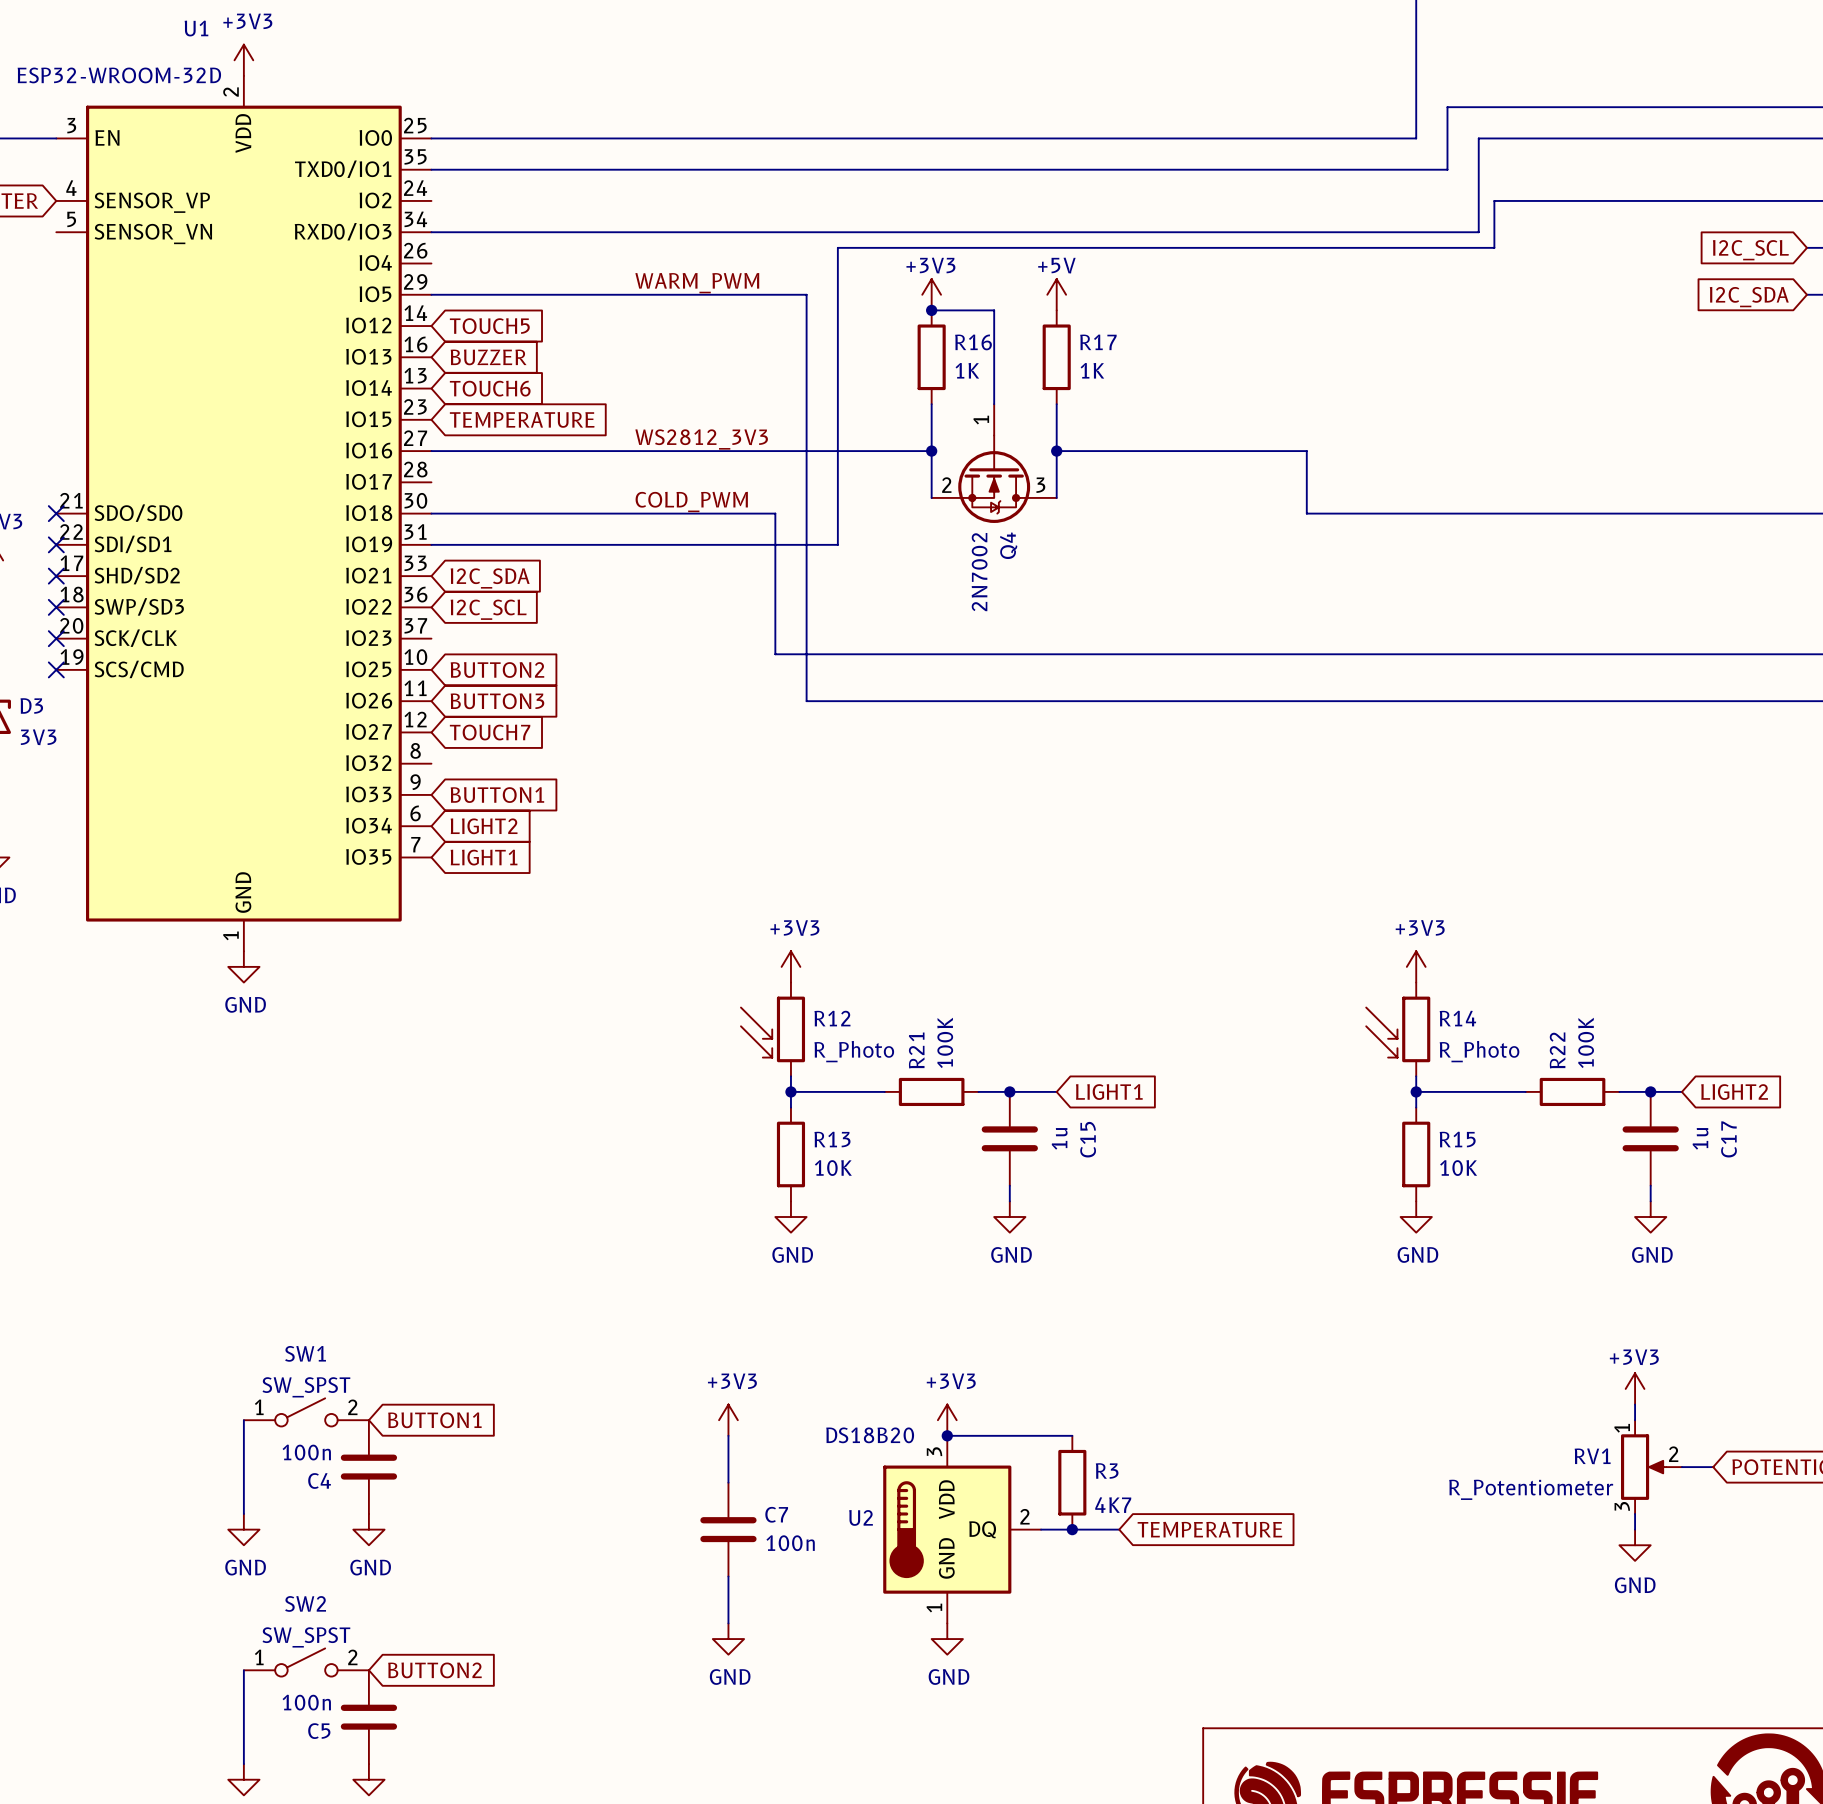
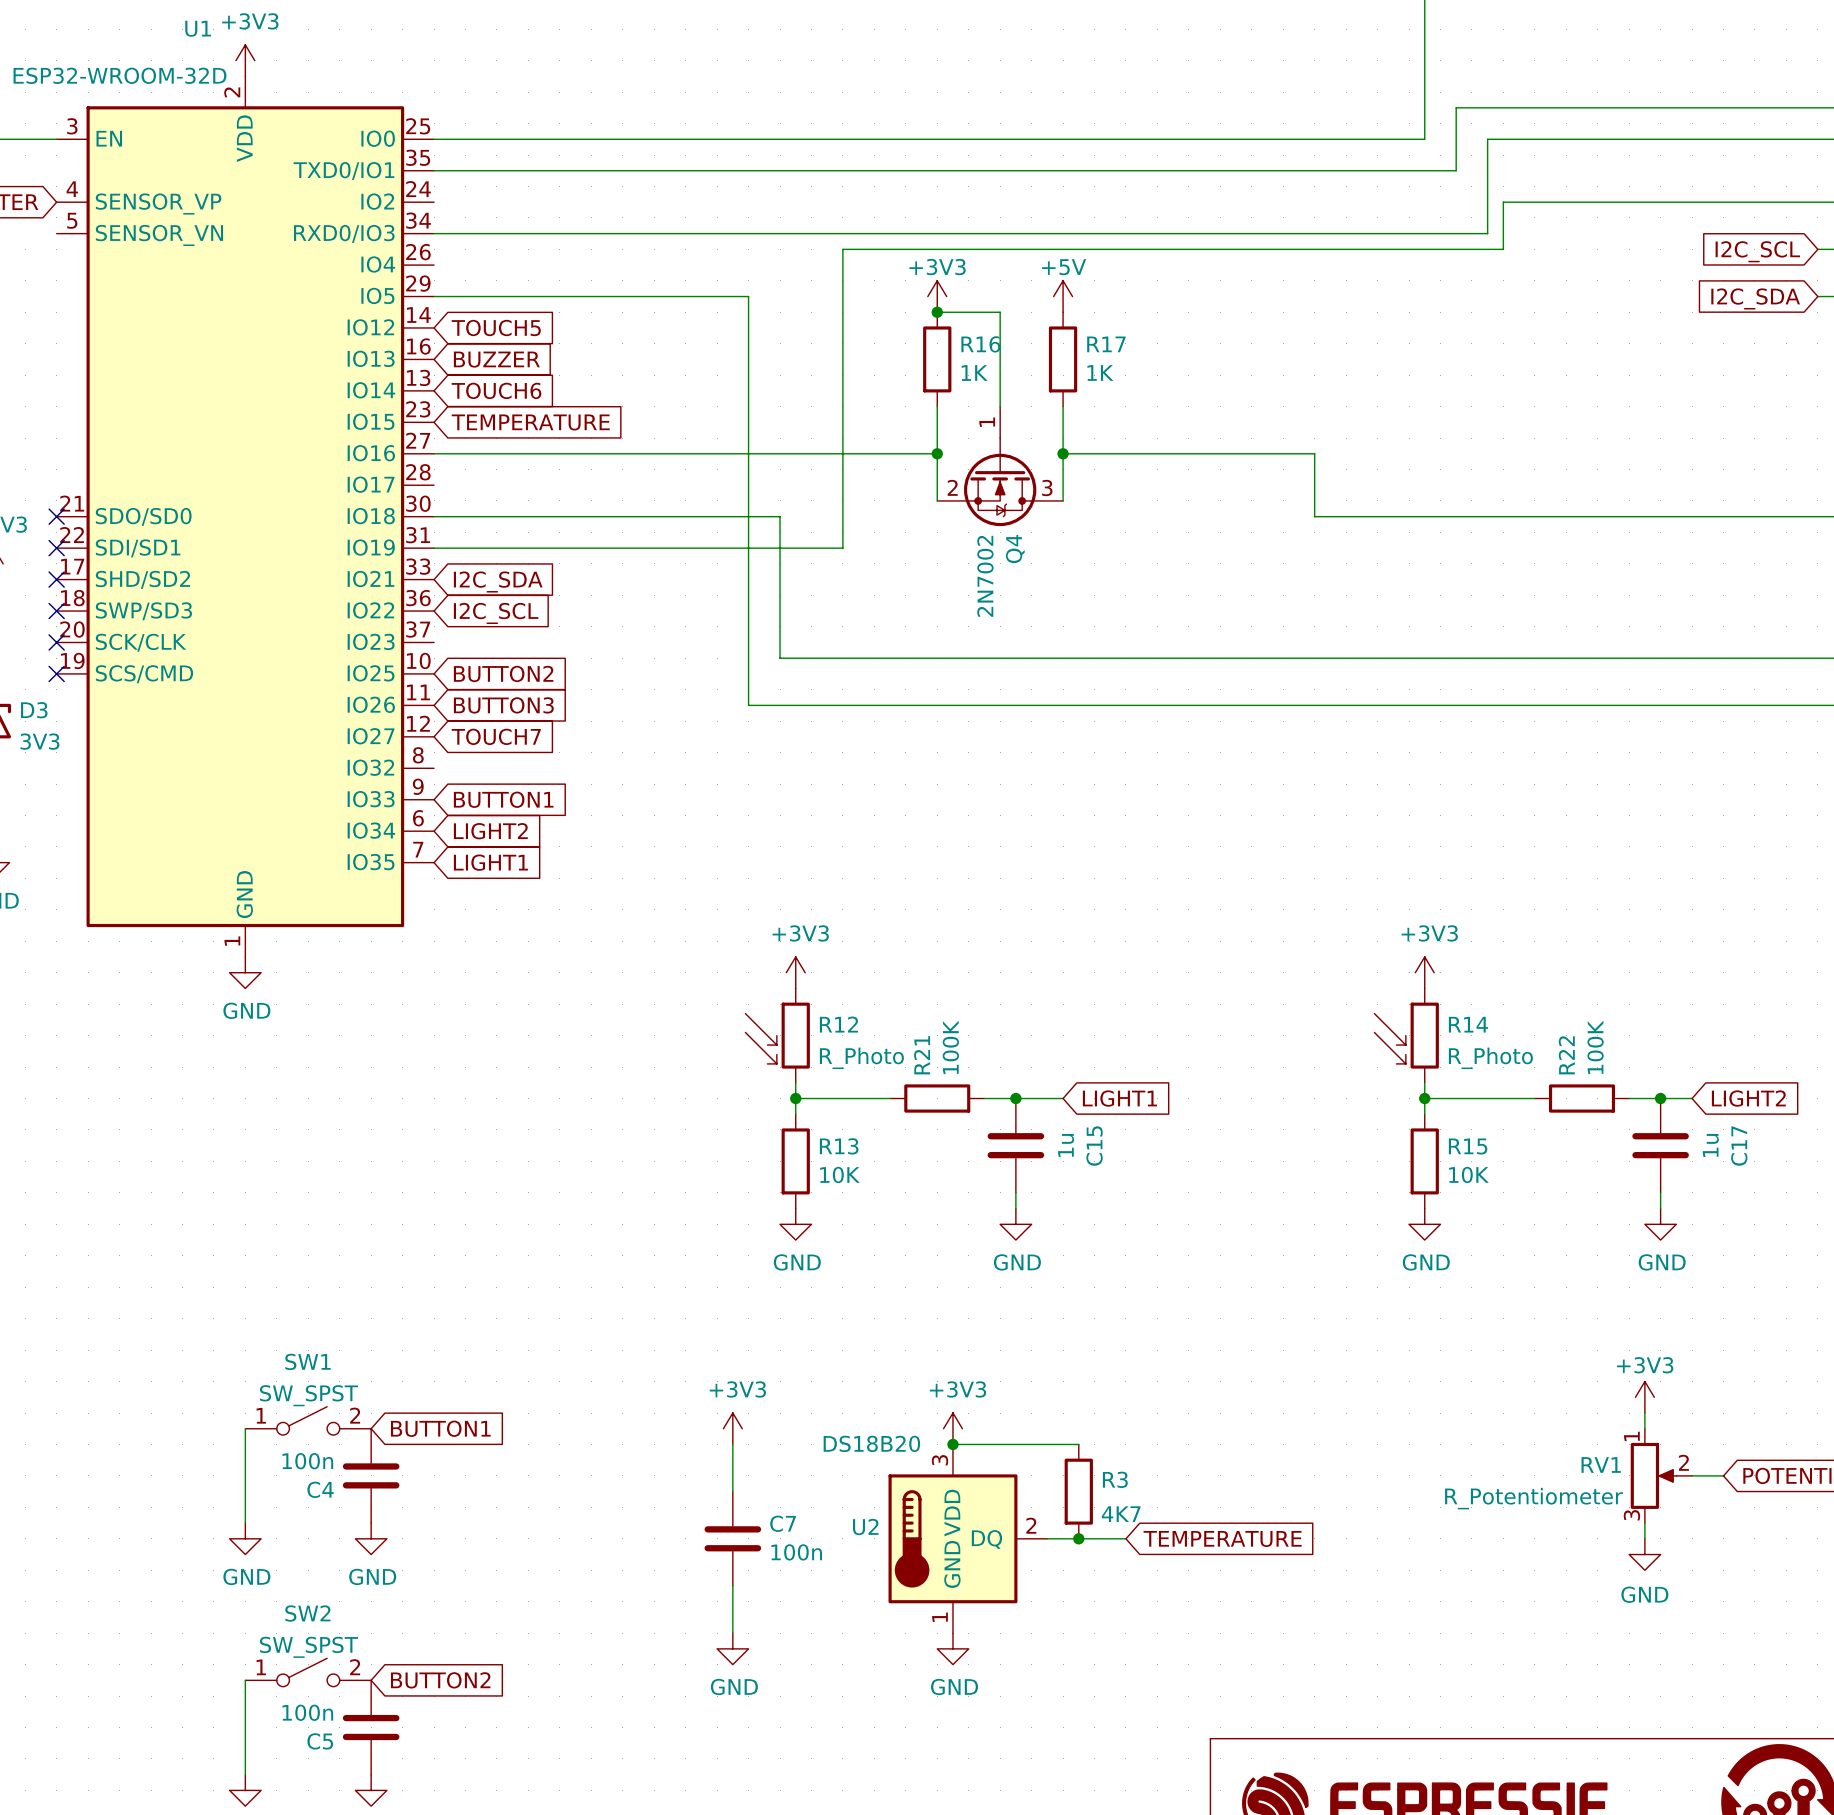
label: WARM_PWM (697, 283) -> none
wire: (744, 294) (806, 294) (806, 701) -> (748, 296) (748, 705) (811, 705)
label: WS2812_3V3 (701, 439) -> none
label: COLD_PWM (691, 501) -> none

